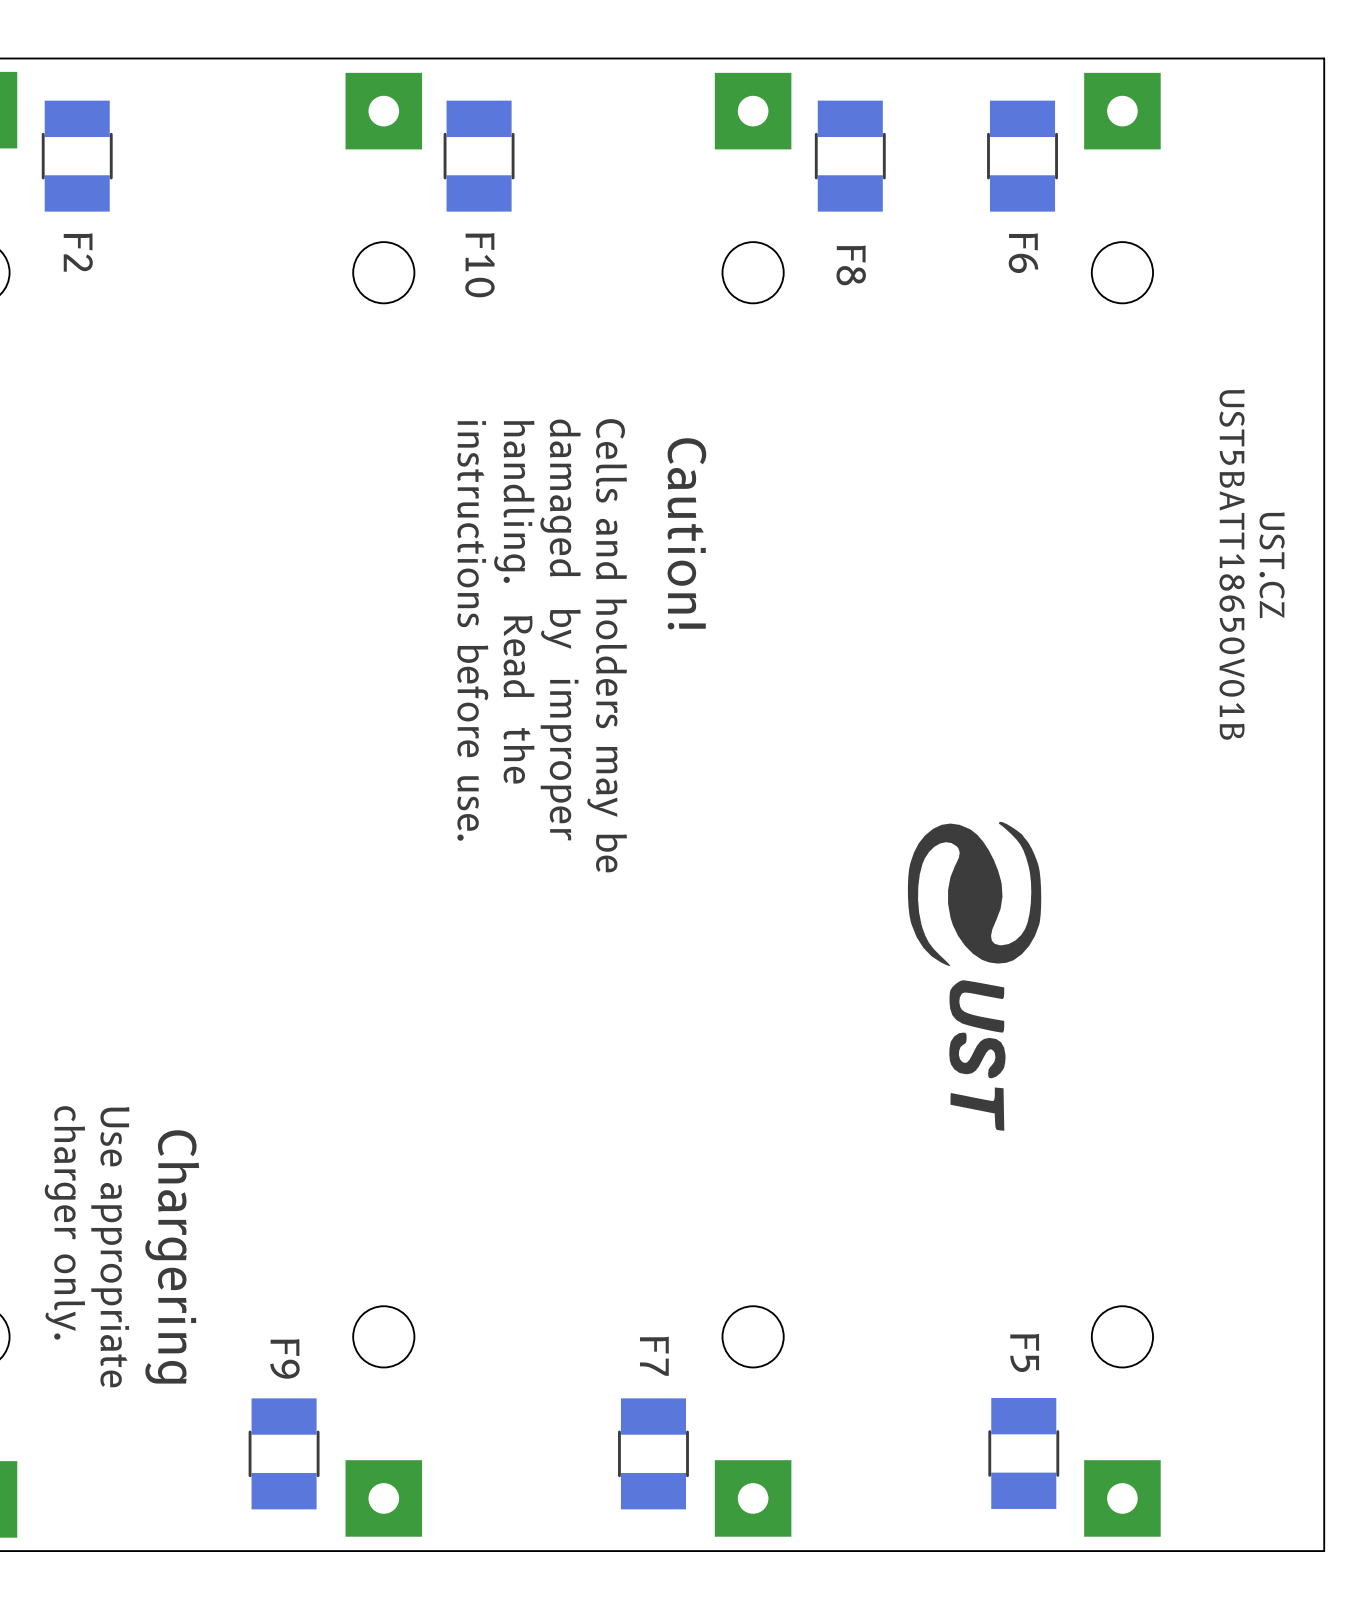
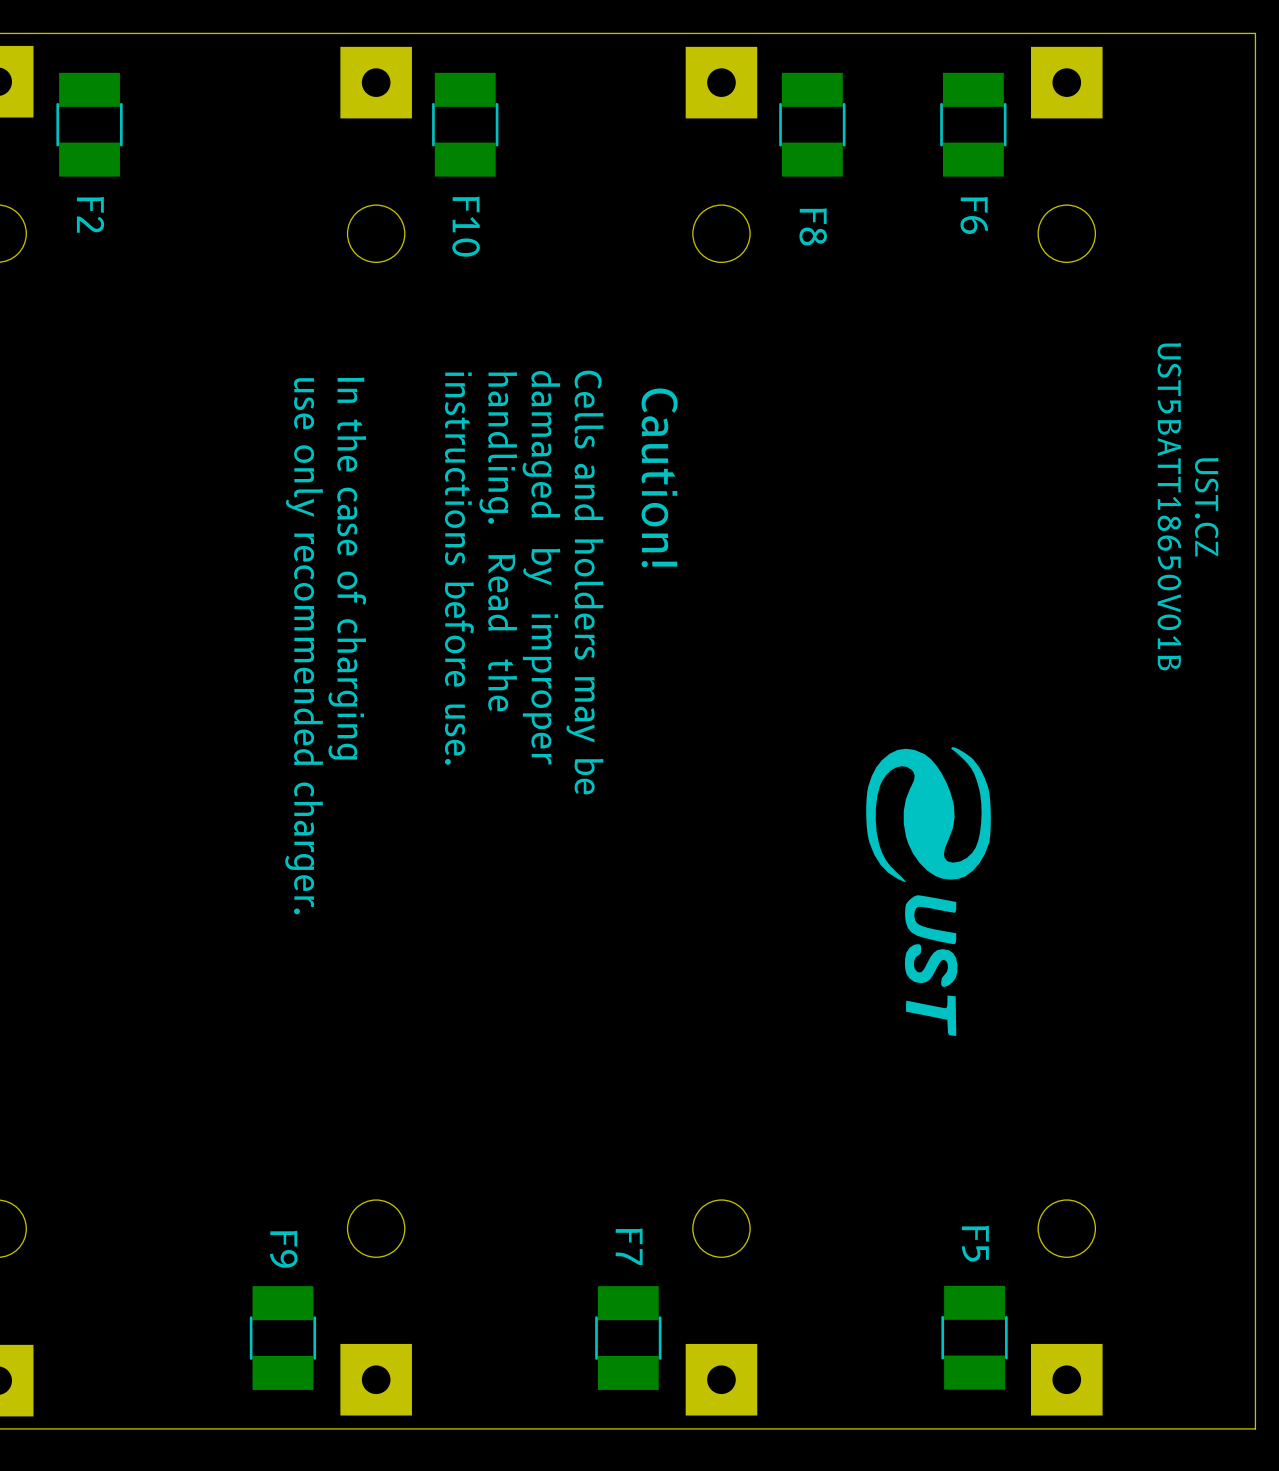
text: none -> In the case of charging (347, 568)
text: none -> use only recommended charger. (304, 646)
text: charger only. (64, 1222) -> none
text: Use appropriate (110, 1247) -> none
text: Chargering (172, 1256) -> none

